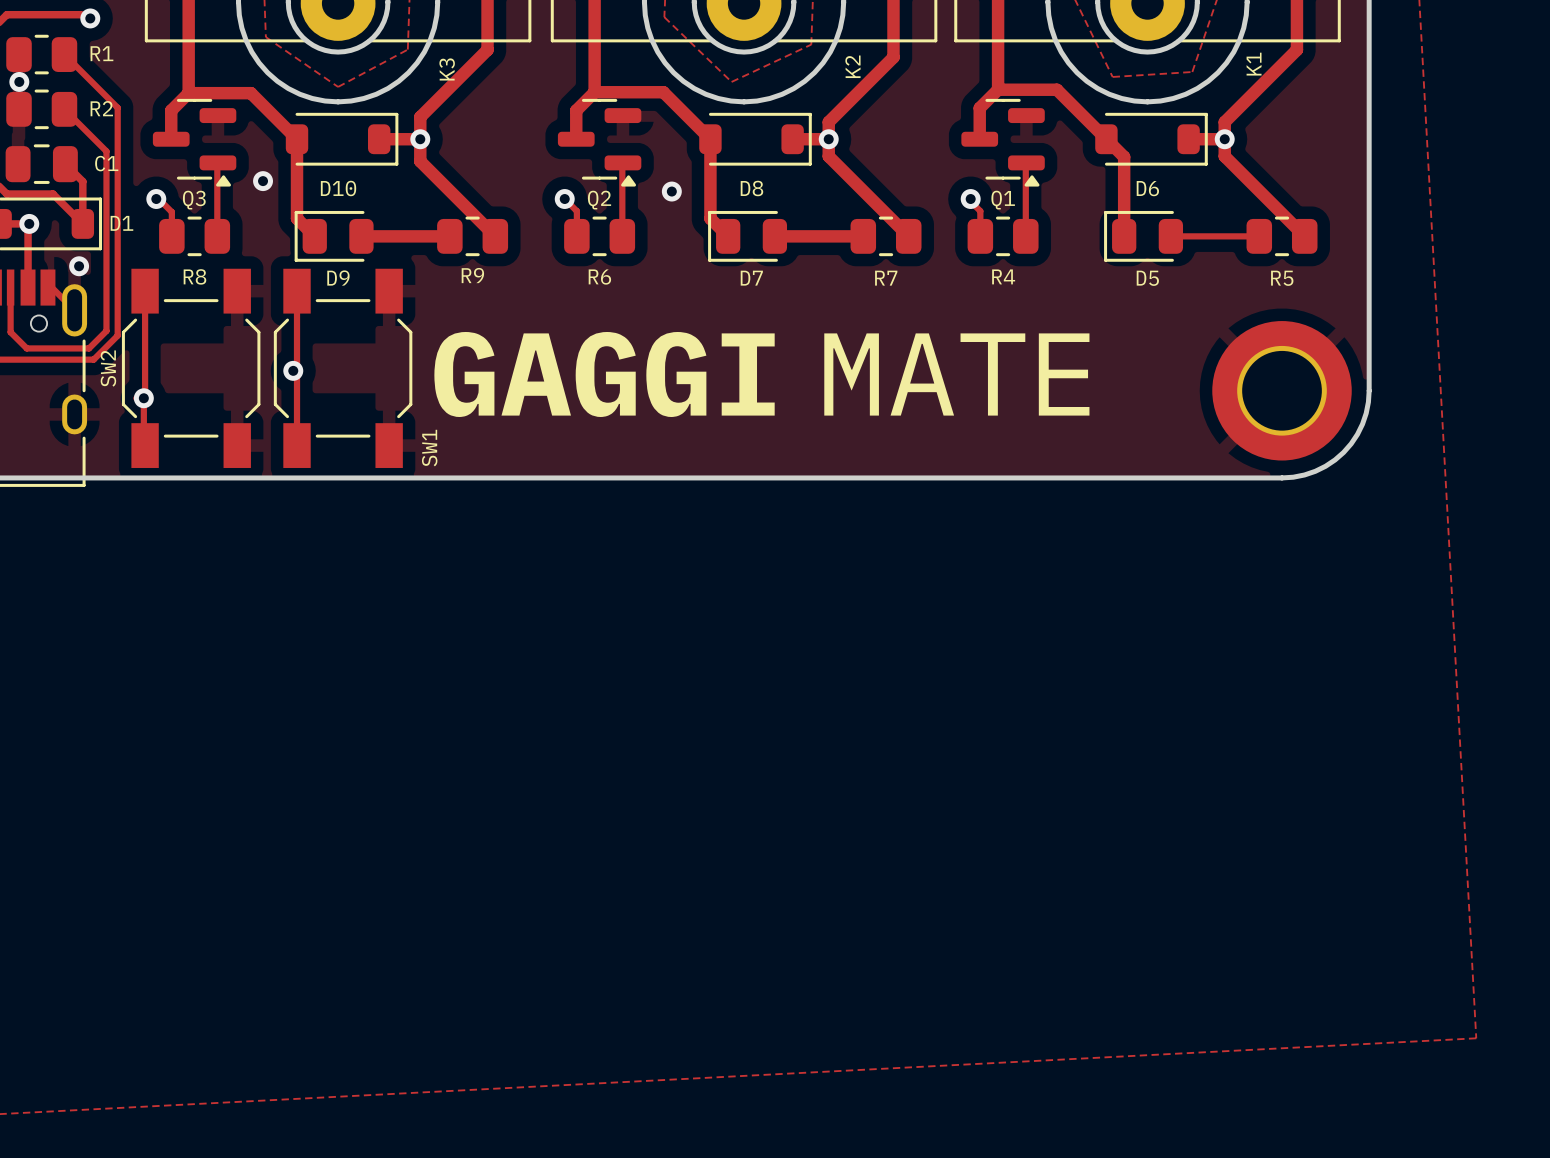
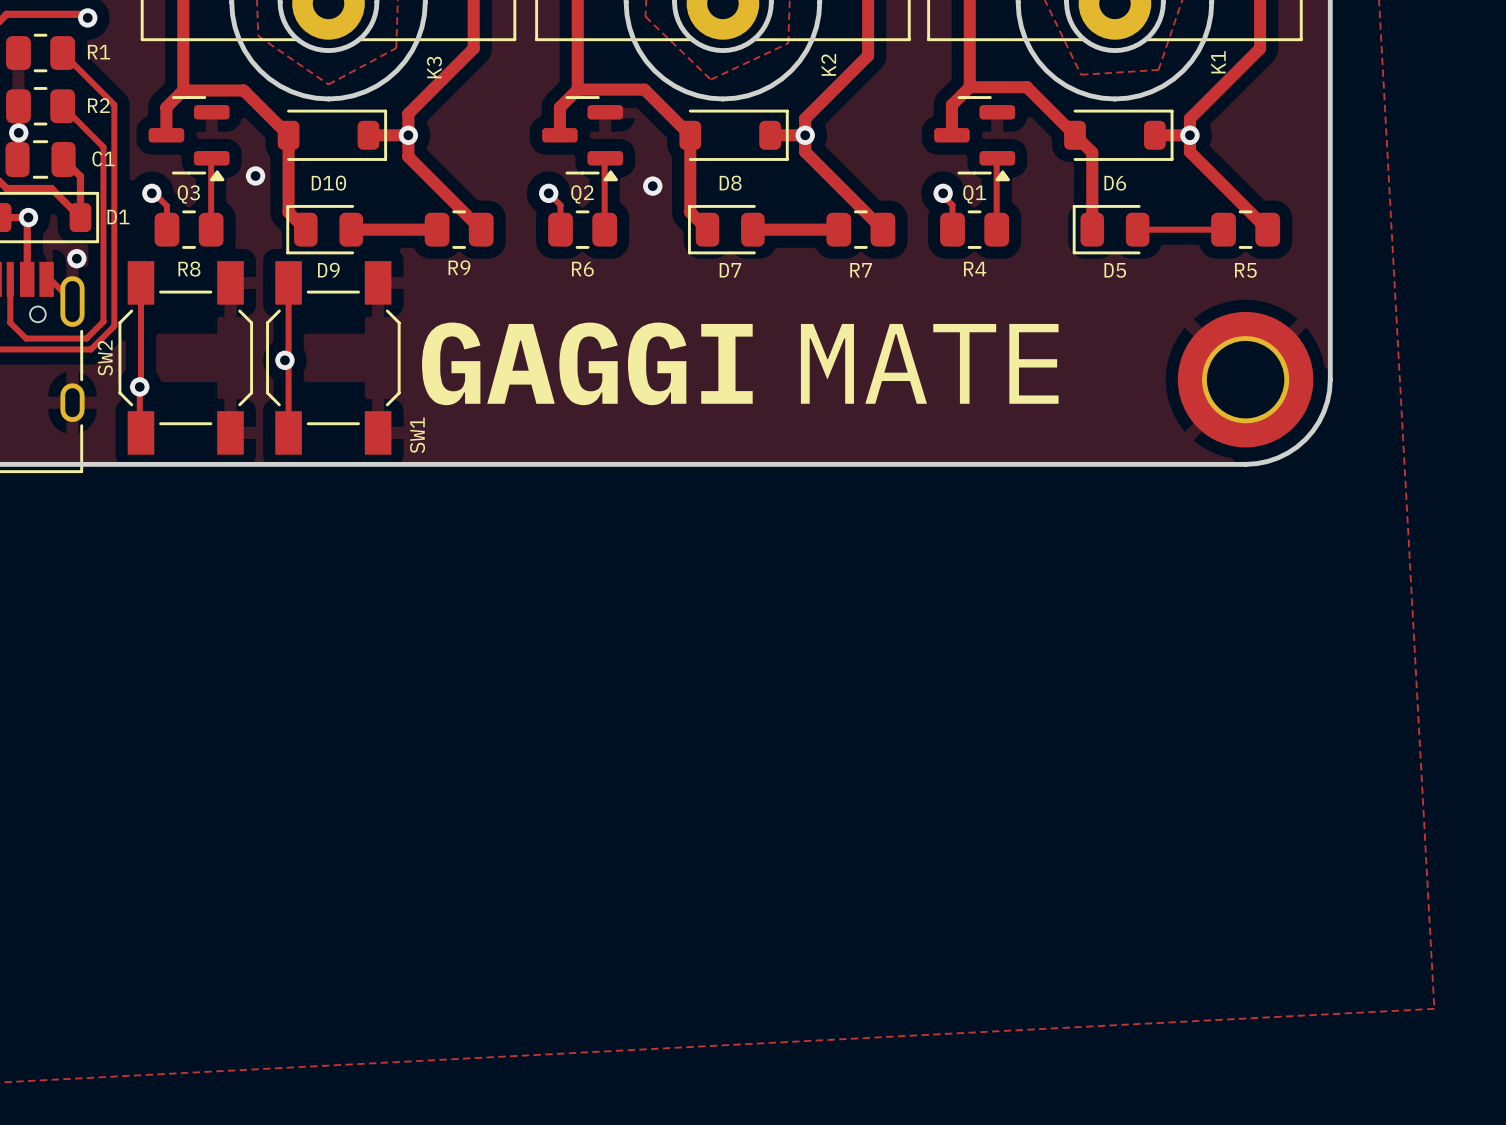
via position: (19, 81) -> (18, 132)

